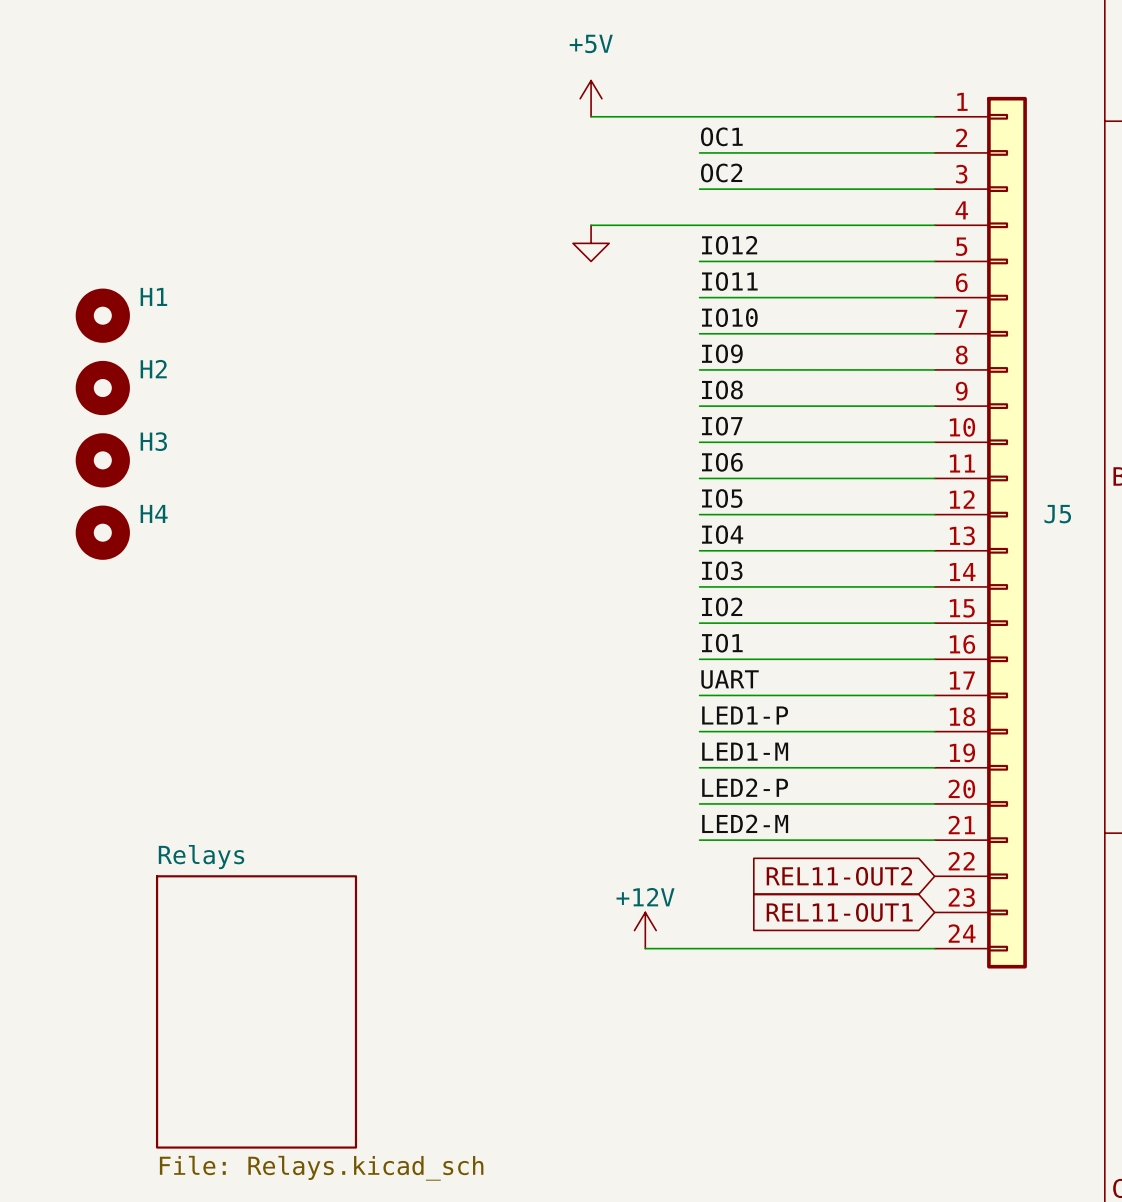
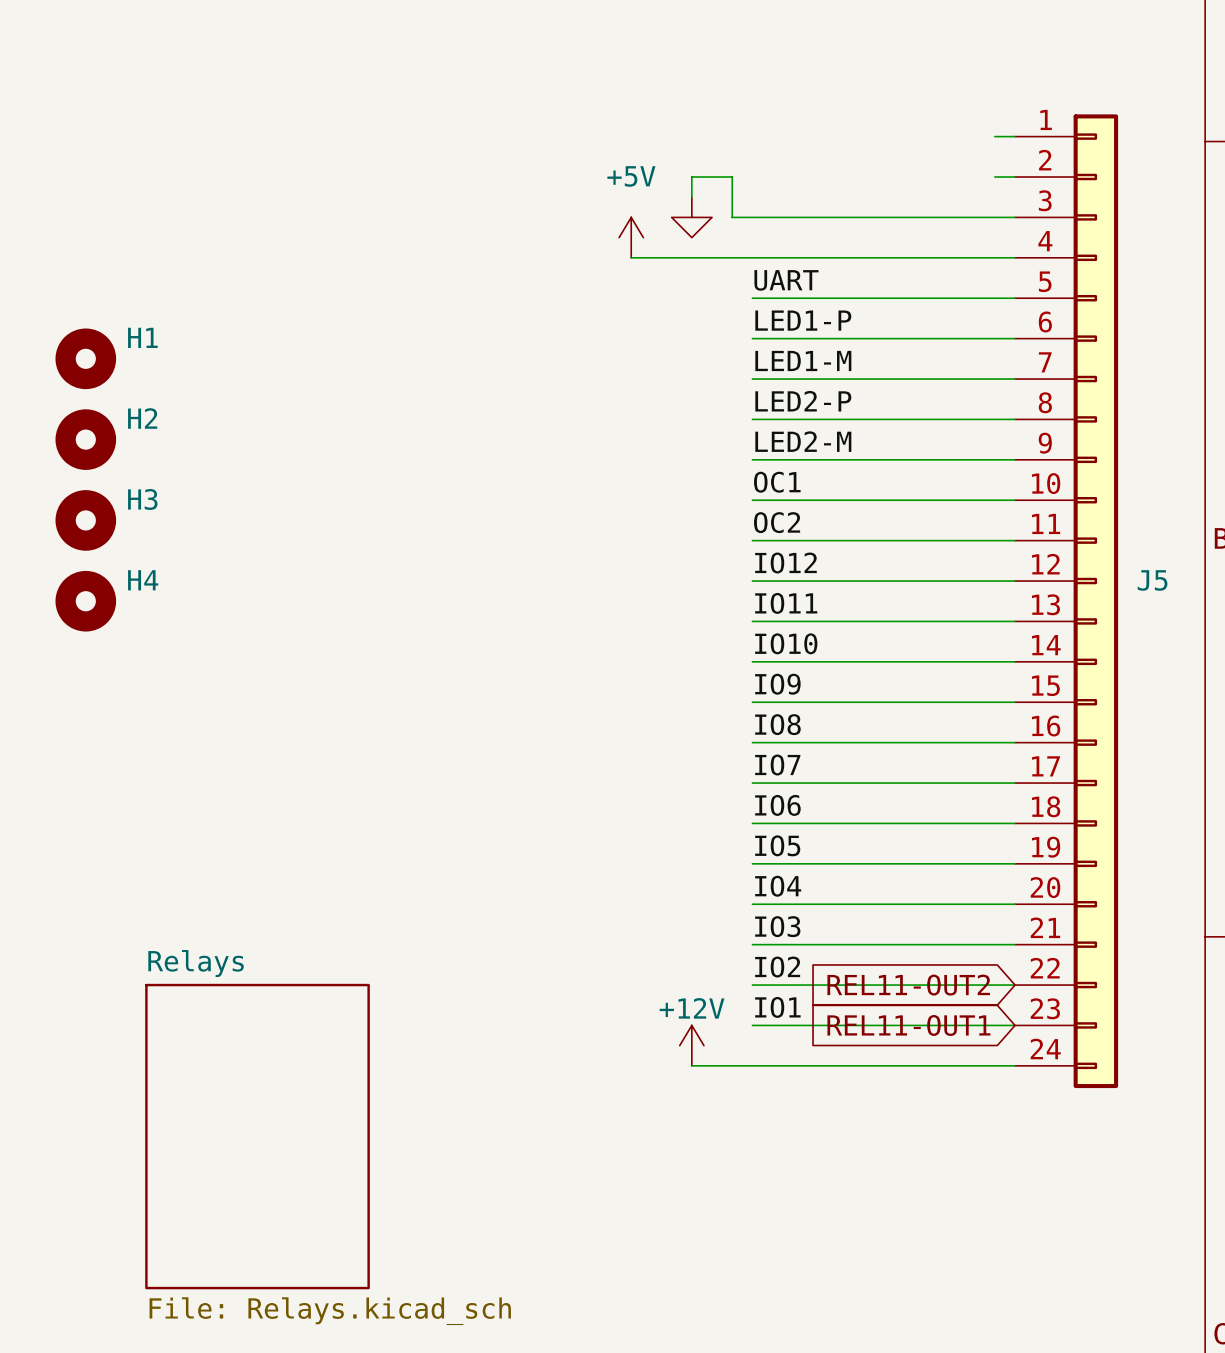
power symbol position: +5V (591, 98) -> +5V (631, 237)
wire: (591, 116) (916, 116) -> none
label: OC1 (721, 136) -> none
wire: (699, 152) (916, 152) -> none
wire: none -> (691, 197) (691, 177) (732, 177) (732, 217) (752, 217)
label: OC2 (721, 172) -> none
power symbol position: (591, 243) -> (691, 217)
label: IO12 (729, 245) -> UART (786, 280)
label: IO11 (729, 281) -> LED1-P (803, 320)
label: IO10 (729, 317) -> LED1-M (803, 360)
label: IO9 (722, 353) -> LED2-P (803, 401)
label: IO8 (722, 389) -> LED2-M (803, 441)
label: IO7 (722, 426) -> OC1 (777, 482)
label: IO6 (722, 462) -> OC2 (777, 522)
label: IO5 (722, 498) -> IO12 (785, 563)
label: IO4 (722, 534) -> IO11 (786, 603)
label: IO3 (722, 570) -> IO10 (786, 643)
label: IO2 (722, 606) -> IO9 (777, 684)
label: IO1 (722, 643) -> IO8 (777, 724)
label: UART (730, 679) -> IO7 (777, 765)
label: LED1-P (745, 715) -> IO6 (777, 805)
label: LED1-M (745, 751) -> IO5 (777, 845)
label: LED2-P (745, 787) -> IO4 (778, 886)
label: LED2-M (745, 823) -> IO3 (777, 926)
label: none -> IO2 (777, 967)
wire: none -> (752, 985) (1015, 985)
label: none -> IO1 (777, 1007)
wire: none -> (752, 1025) (1015, 1025)

